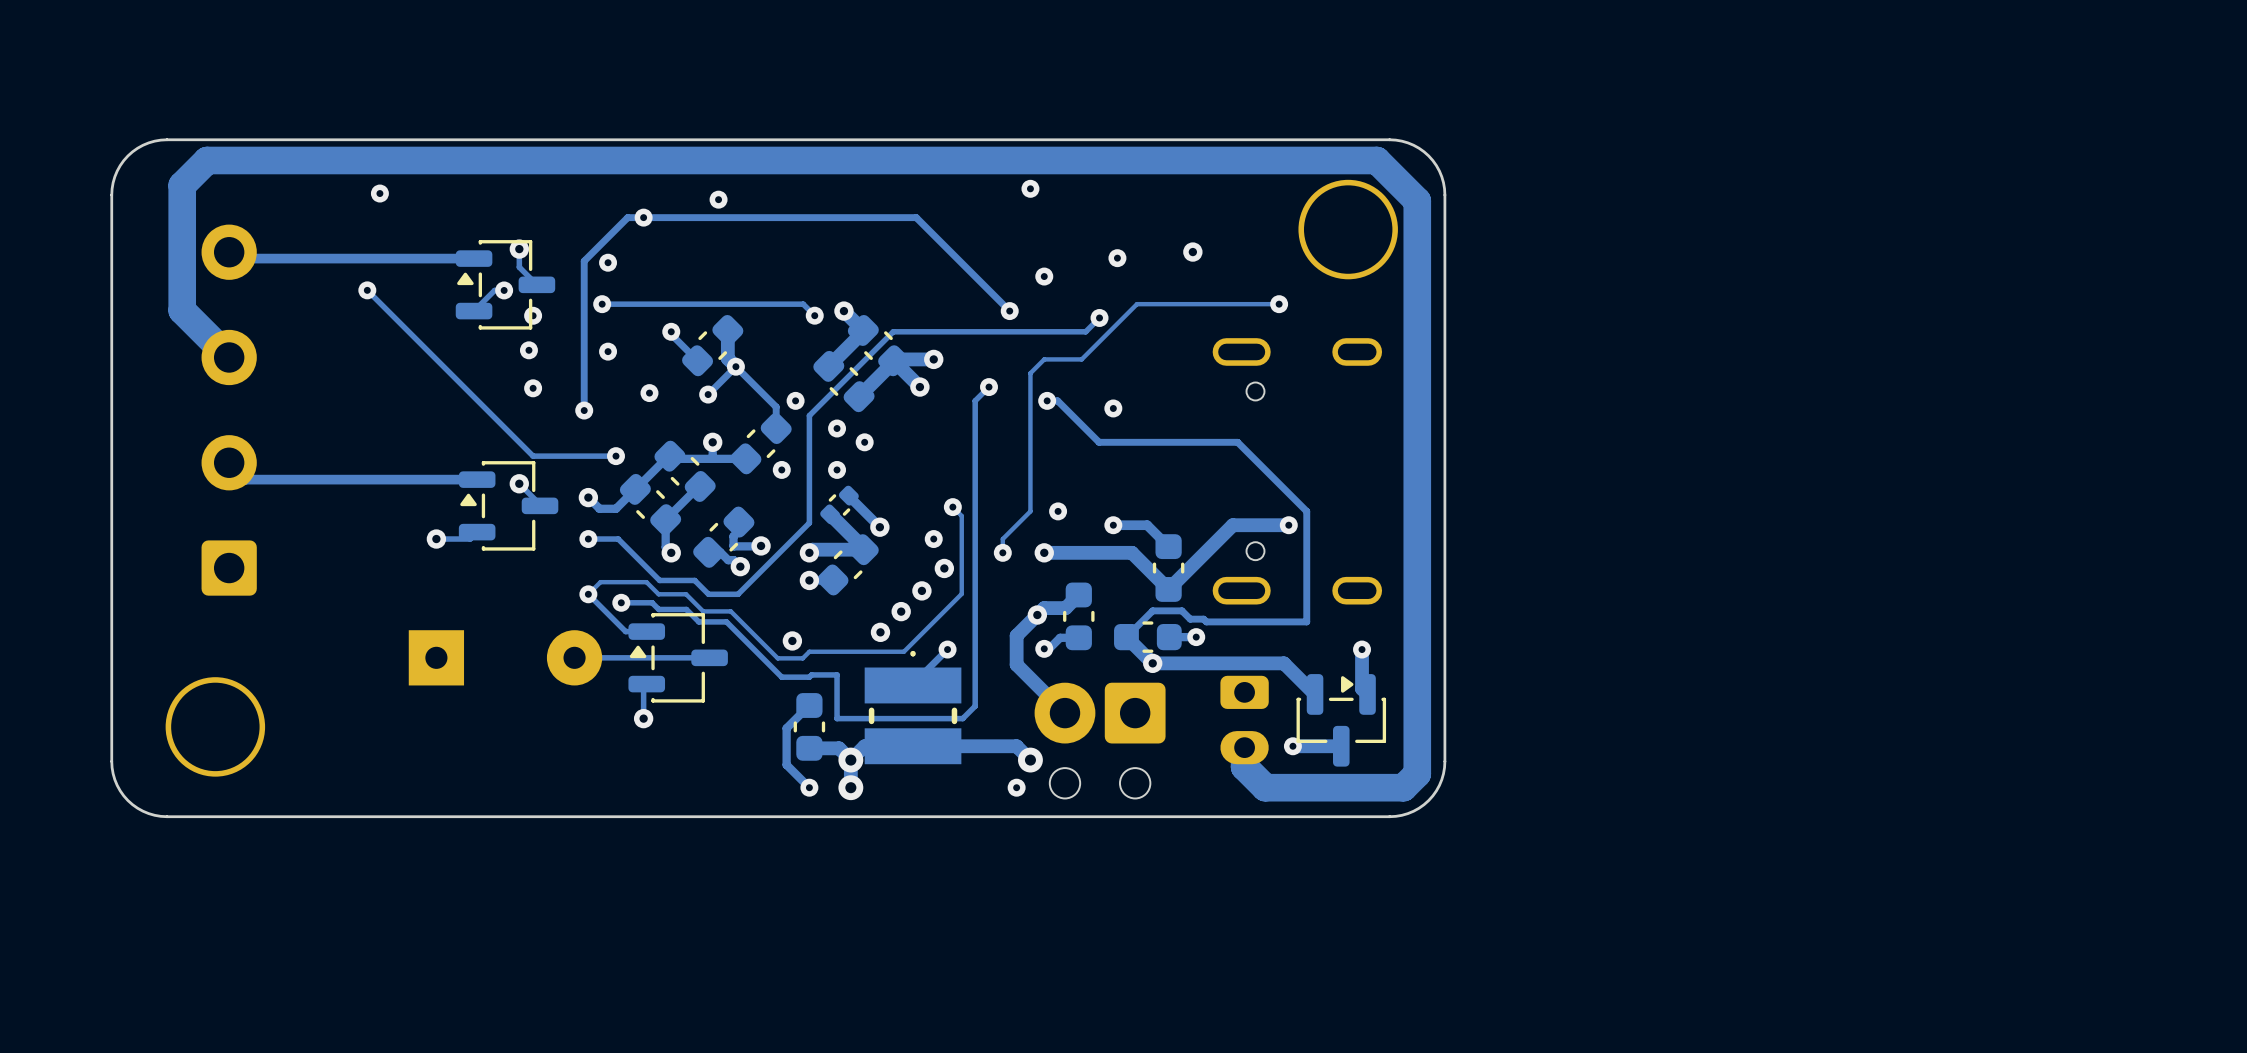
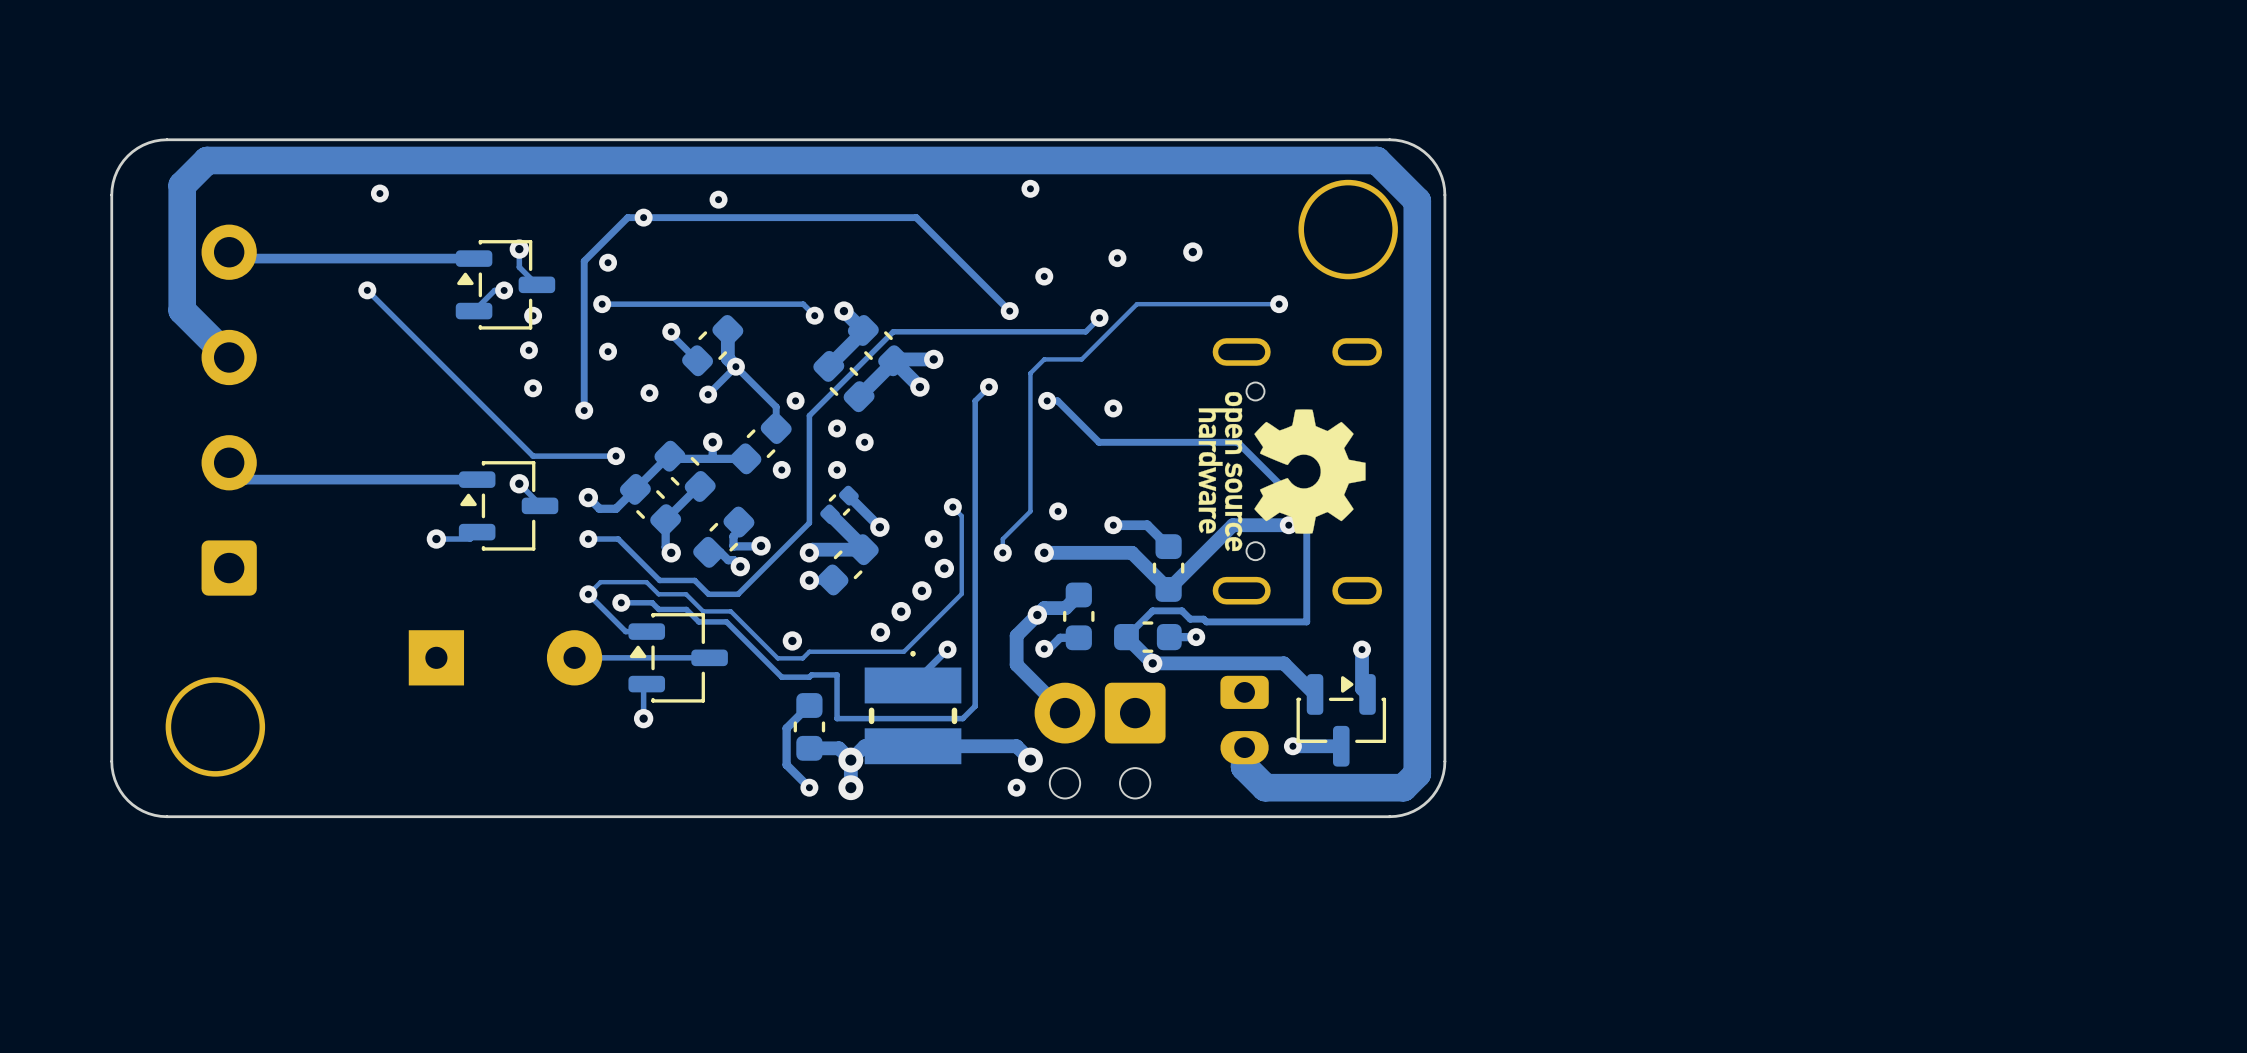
drawing: none -> [1198, 392, 1366, 552]

